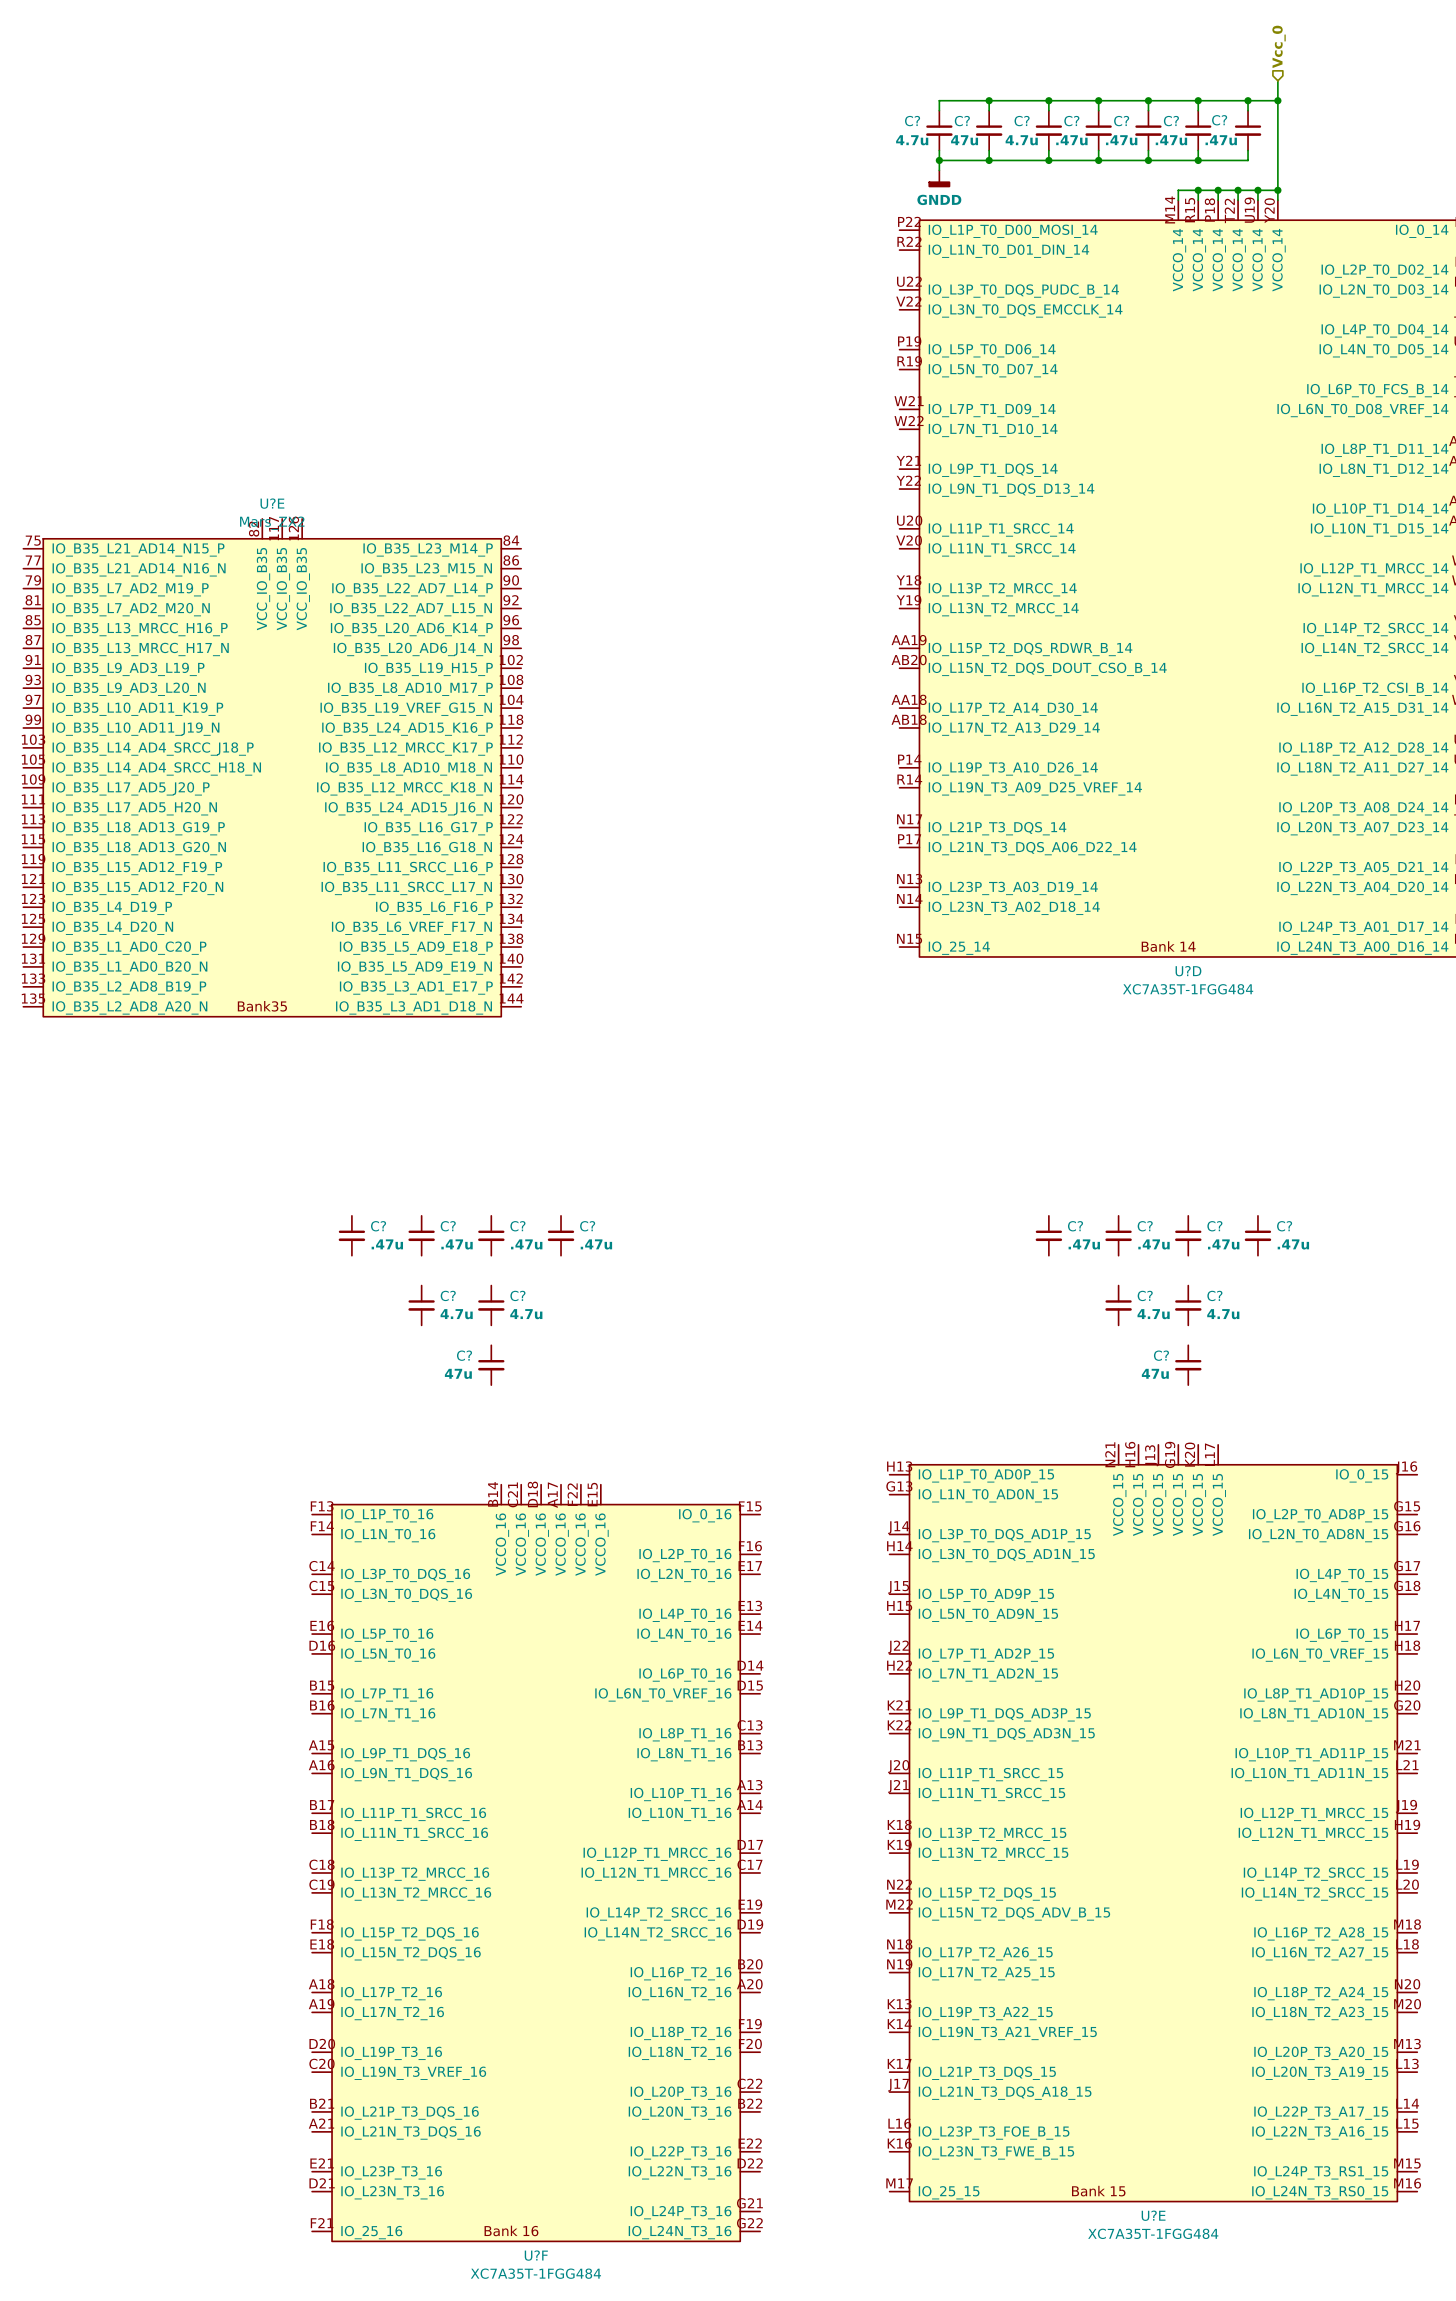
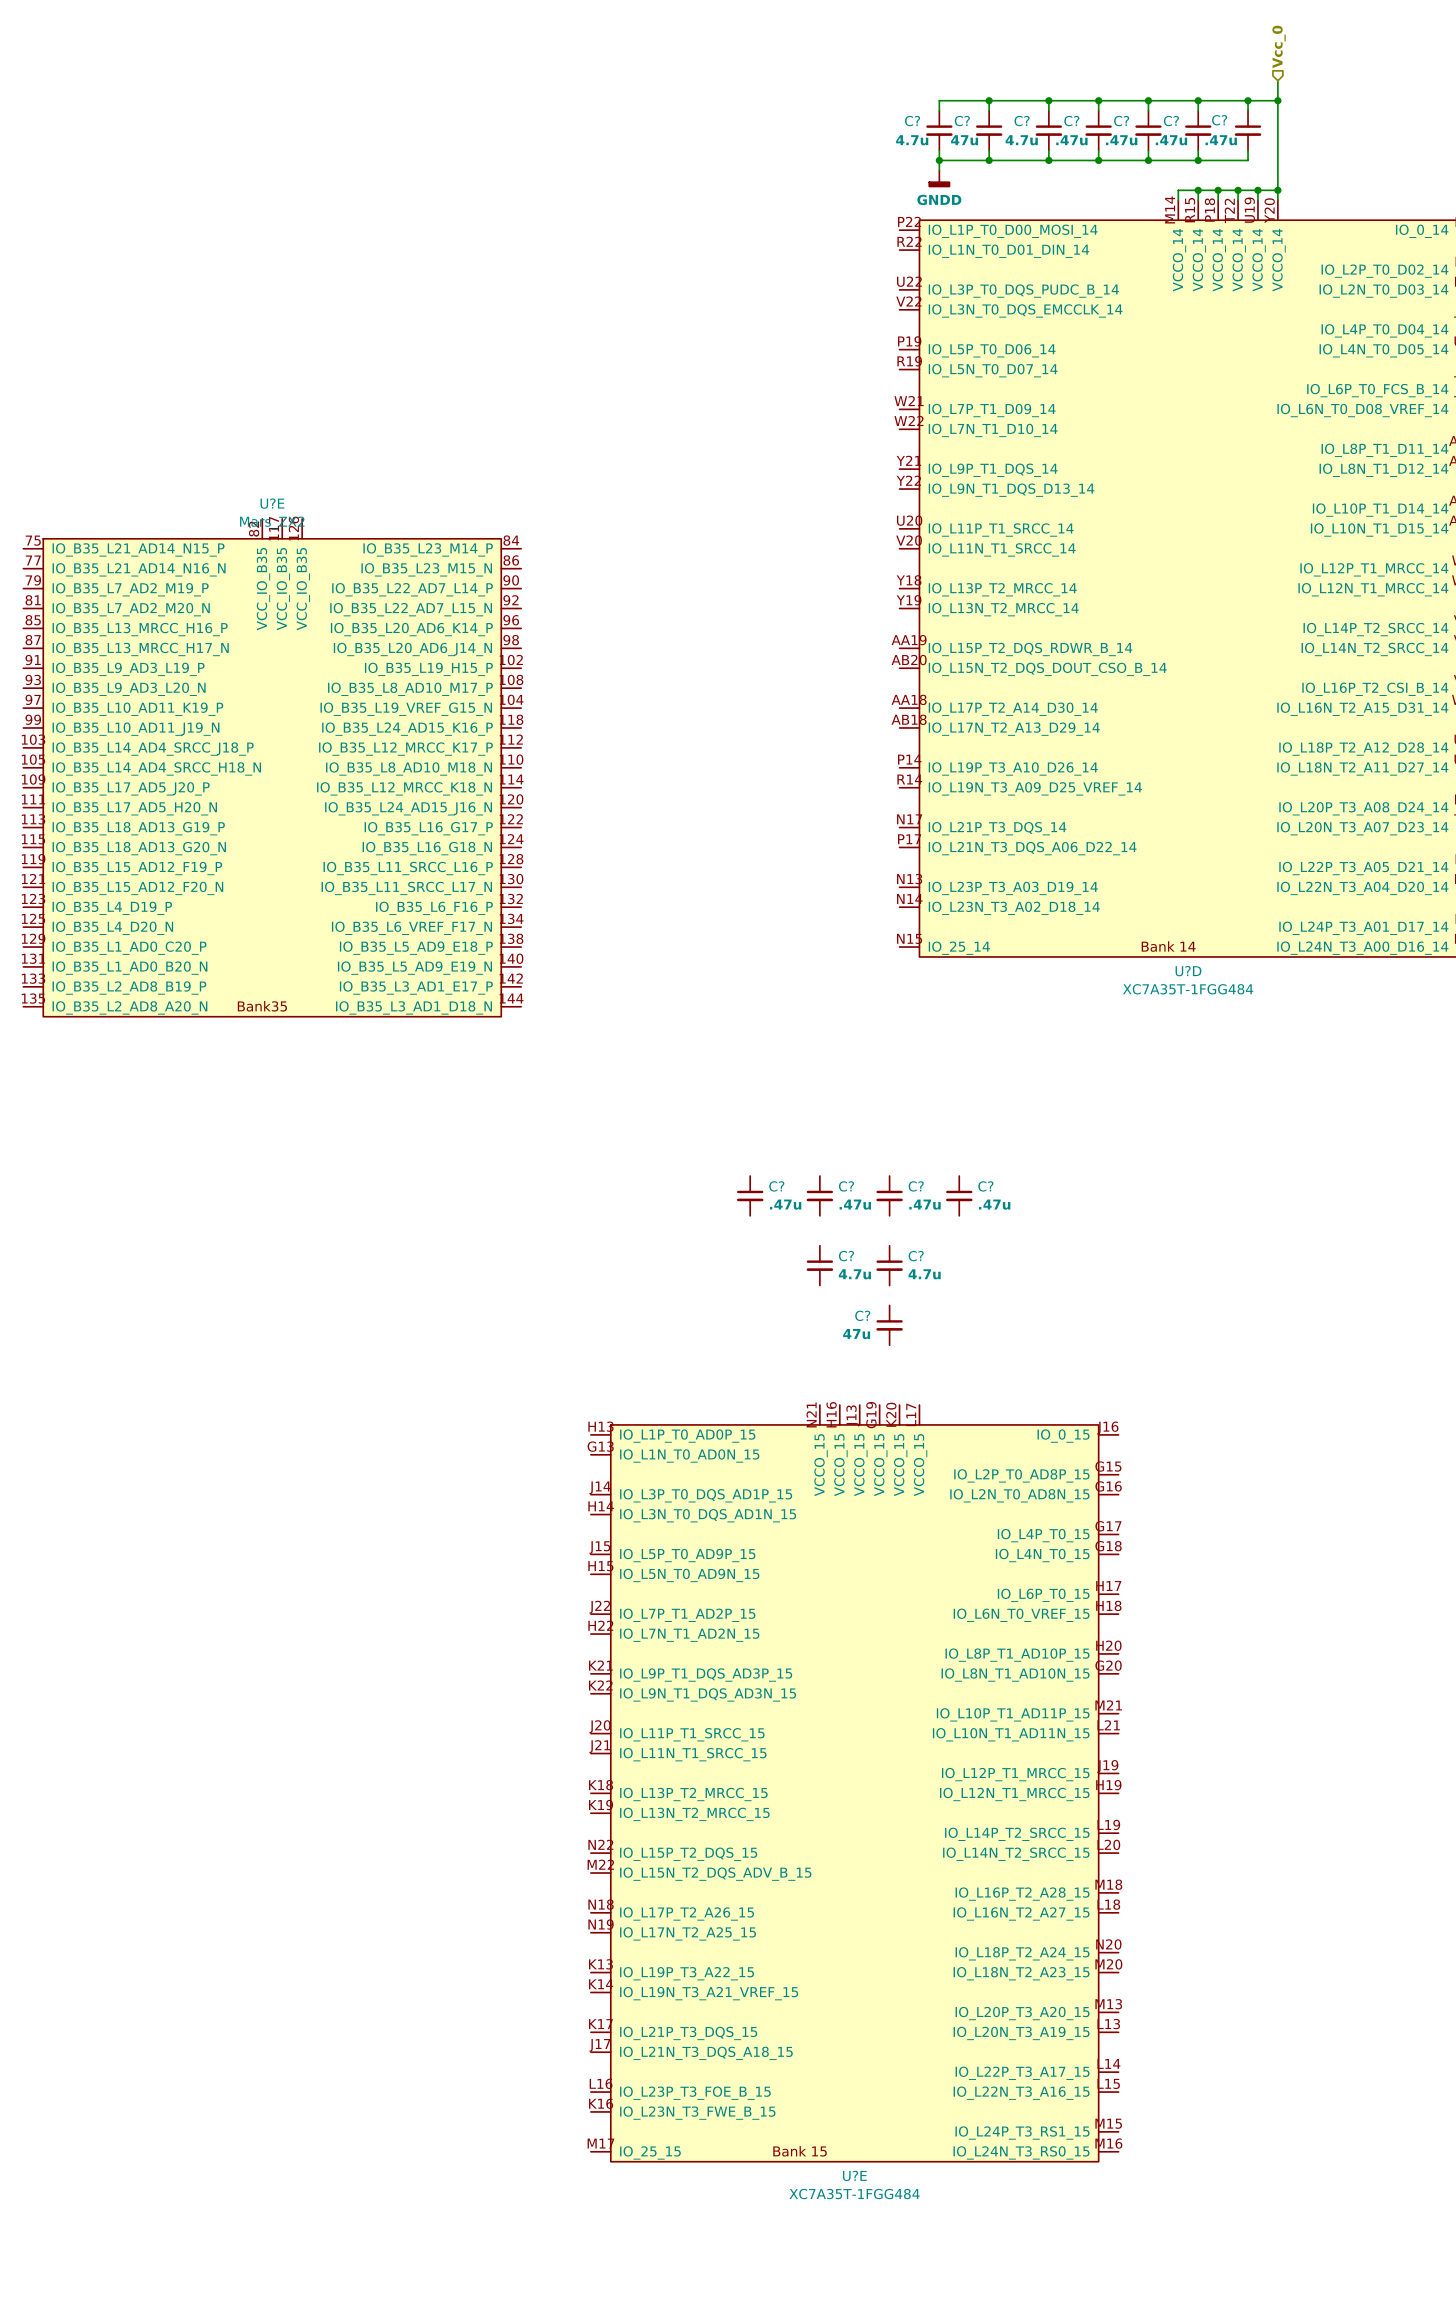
C?: none -> .47u (750, 1195)
C?: none -> .47u (819, 1195)
C?: none -> .47u (889, 1195)
C?: none -> .47u (959, 1195)
C?: .47u (351, 1235) -> none
C?: .47u (421, 1235) -> none
C?: .47u (491, 1235) -> none
C?: .47u (561, 1235) -> none
C?: .47u (1048, 1235) -> none
C?: .47u (1118, 1235) -> none
C?: .47u (1188, 1235) -> none
C?: .47u (1257, 1235) -> none
C?: none -> 4.7u (819, 1265)
C?: none -> 4.7u (889, 1265)
C?: 4.7u (421, 1305) -> none
C?: 4.7u (491, 1305) -> none
C?: 4.7u (1118, 1305) -> none
C?: 4.7u (1188, 1305) -> none
C?: none -> 47u (889, 1325)
C?: 47u (491, 1365) -> none
C?: 47u (1188, 1365) -> none
U?E: none -> XC7A35T-1FGG484 (854, 1783)
U?E: XC7A35T-1FGG484 (1153, 1823) -> none
U?F: XC7A35T-1FGG484 (536, 1863) -> none

